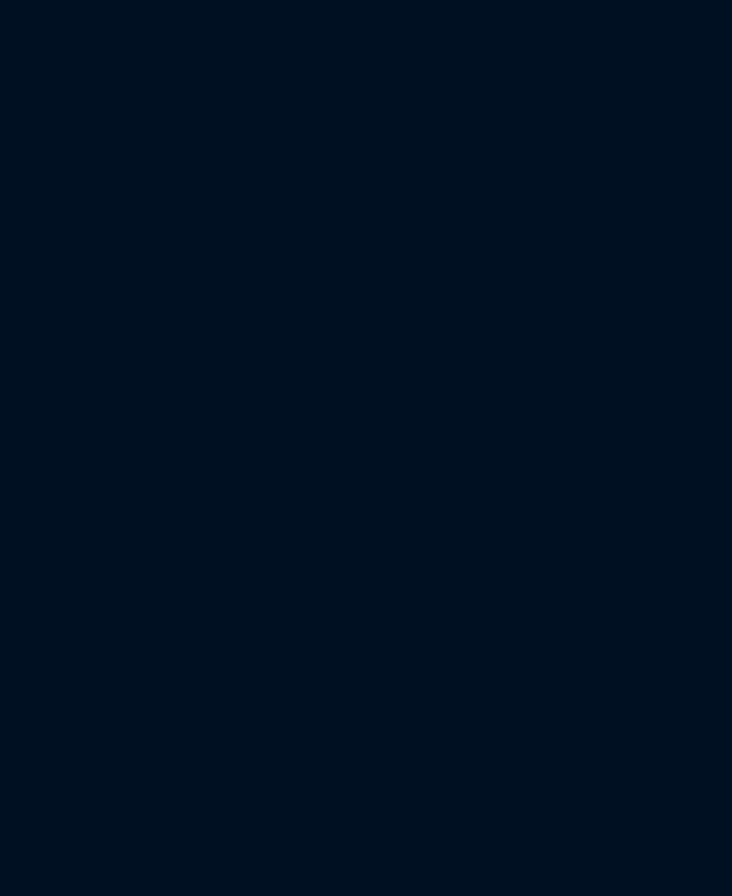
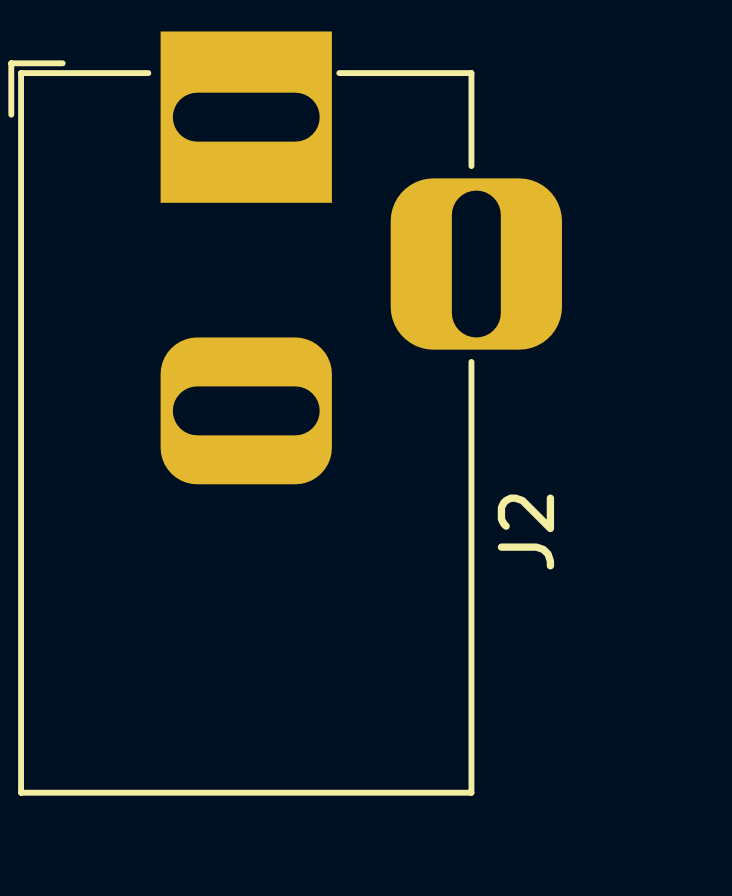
J2: none -> (285, 413)

